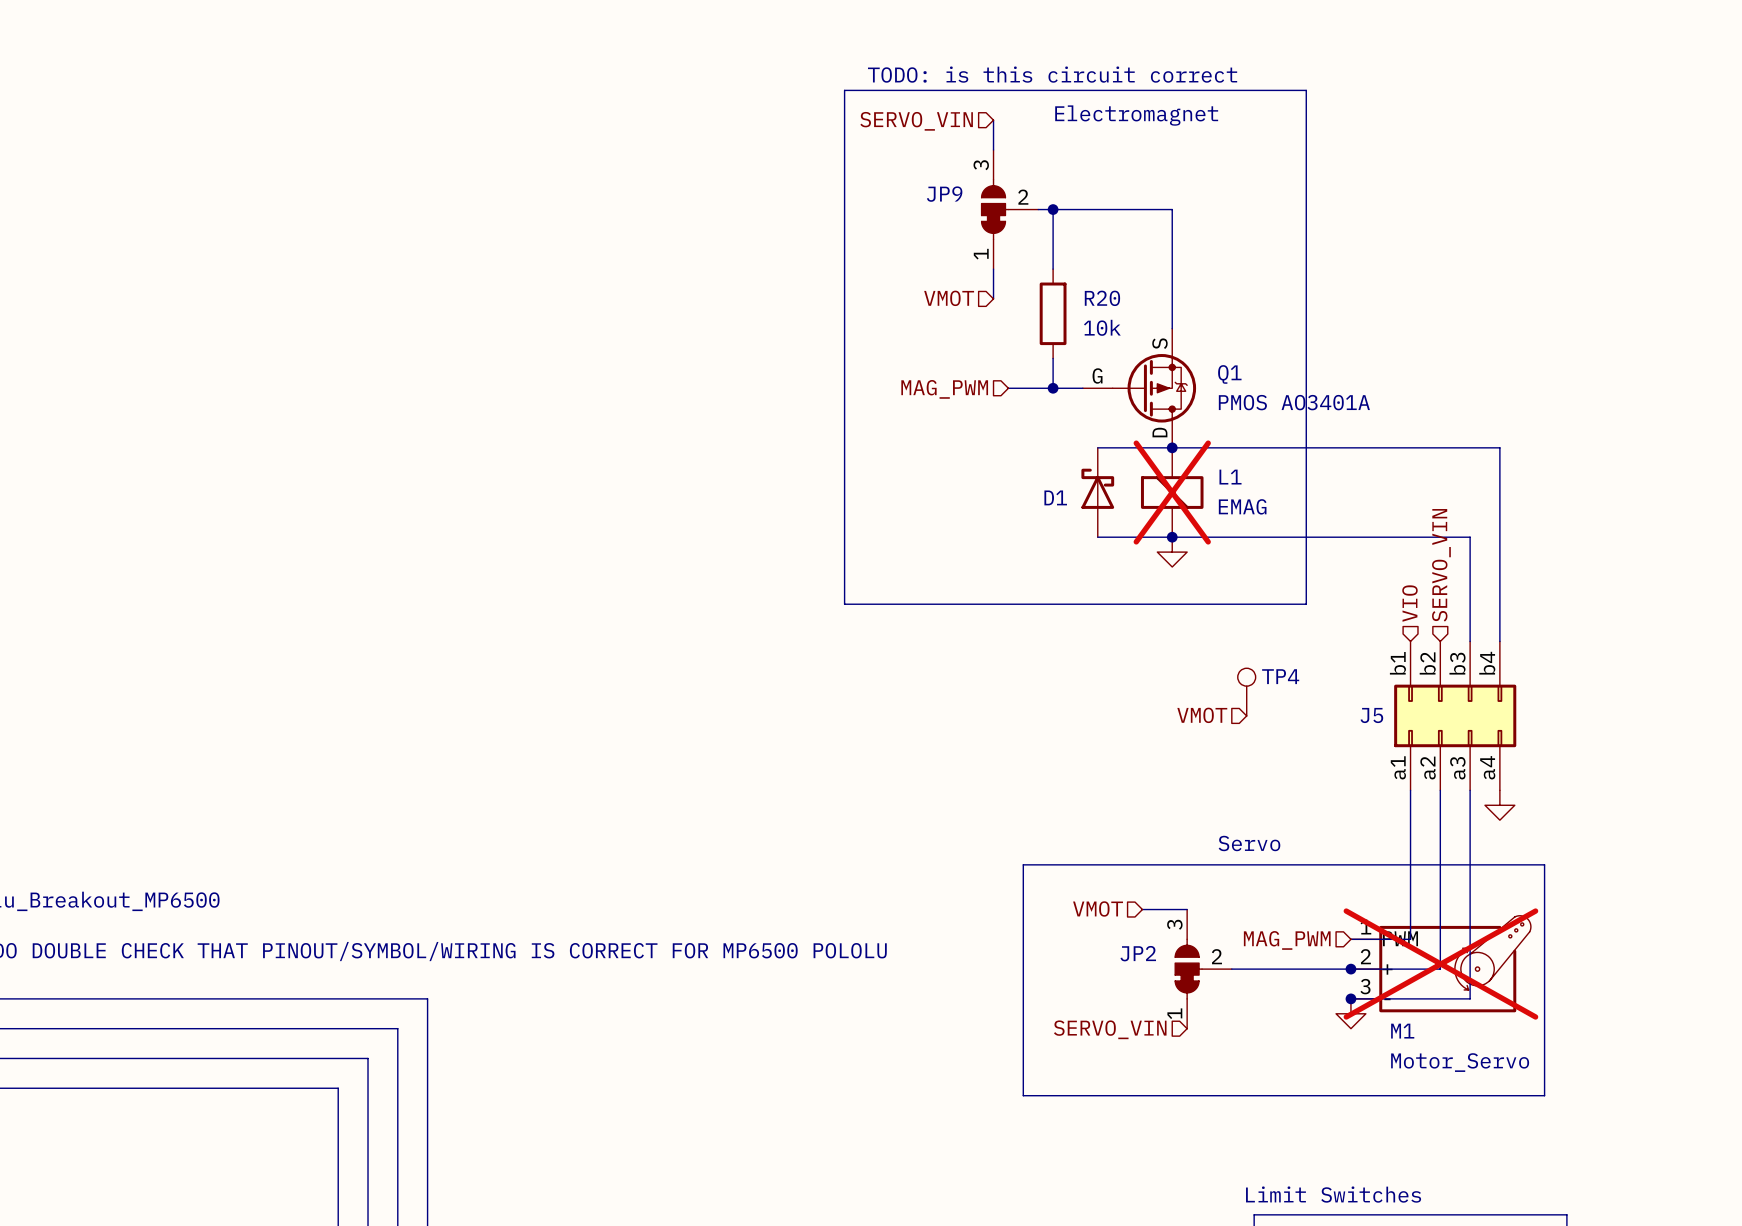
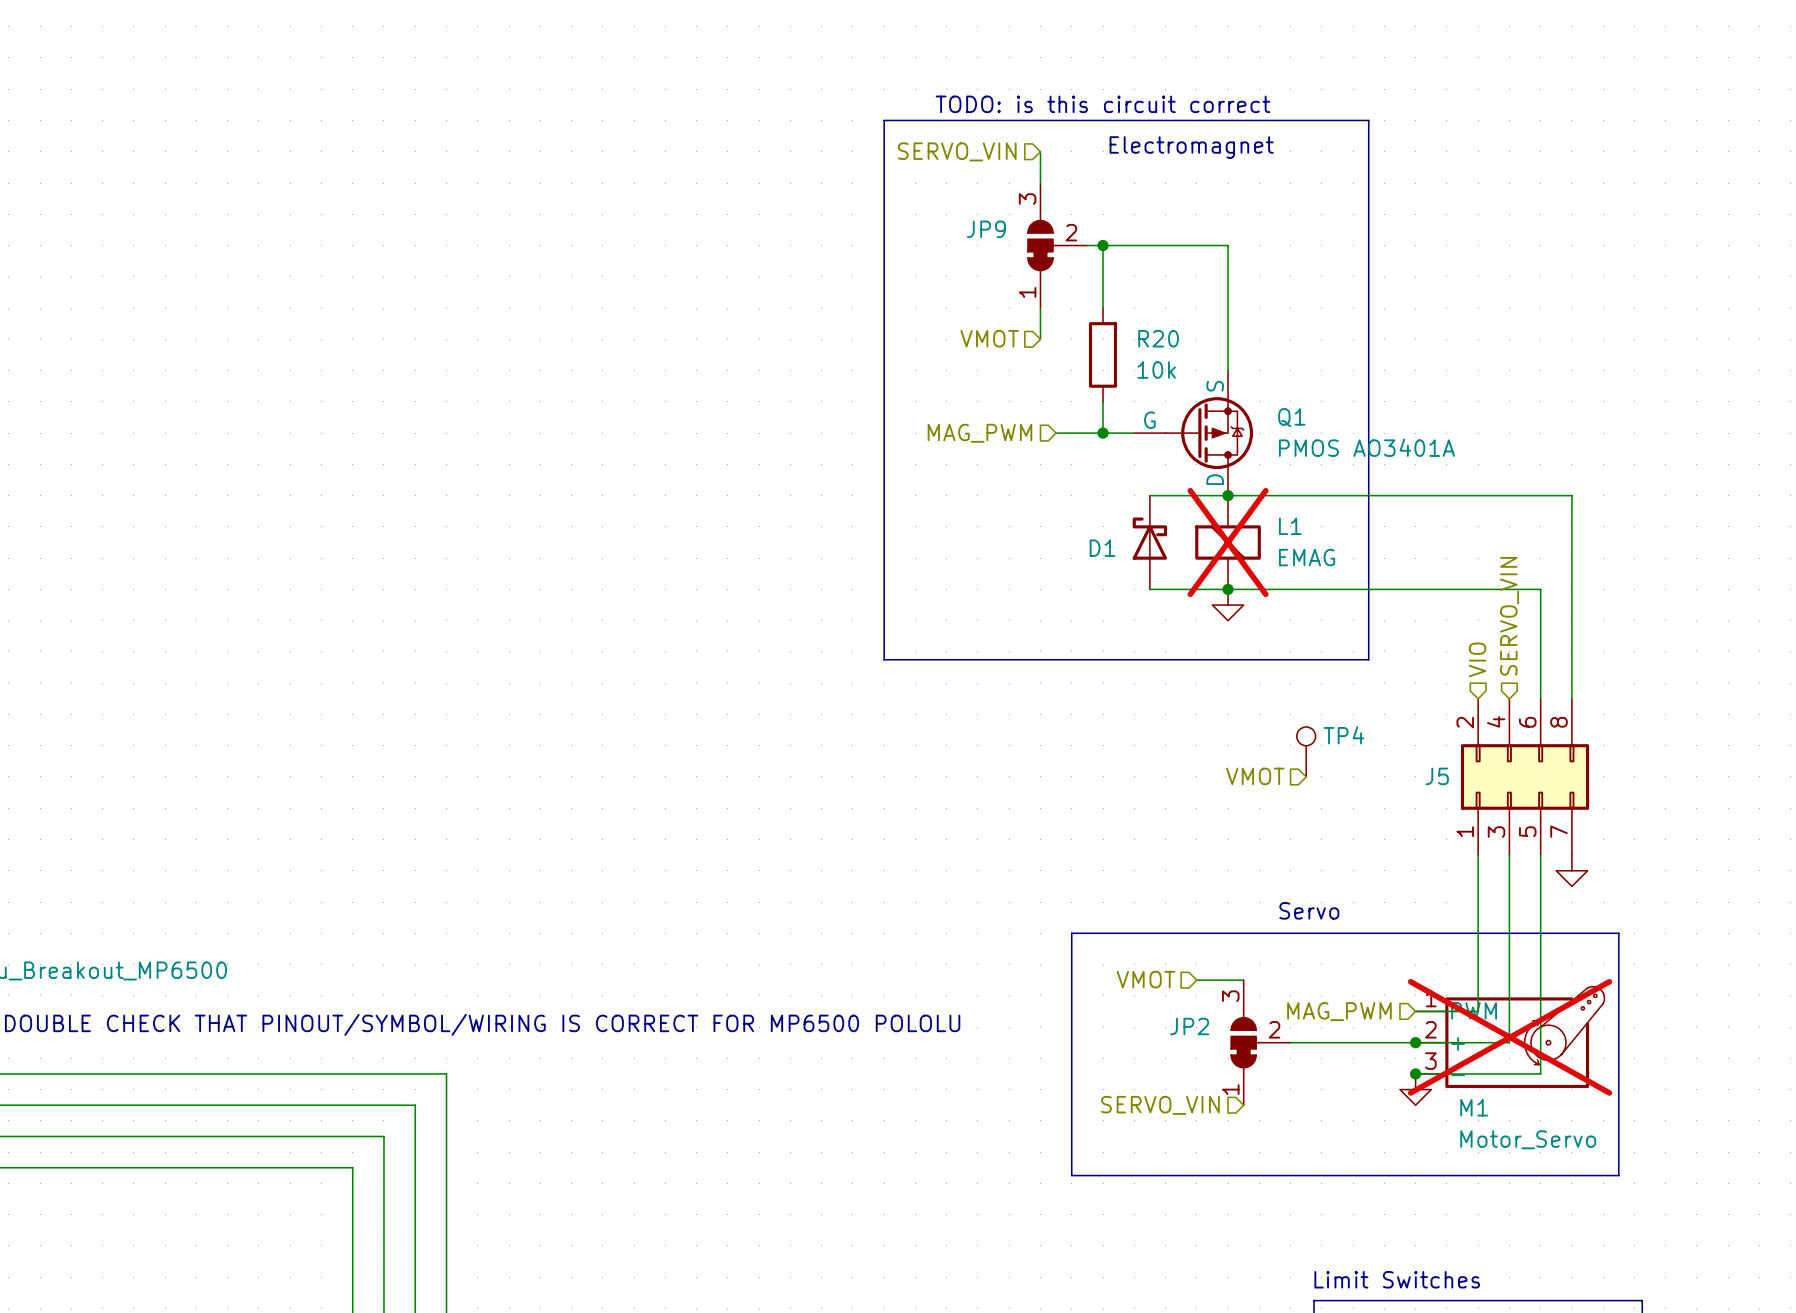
J5 pin number: b1 (1397, 663) -> 2 (1465, 722)
J5 pin number: b2 (1427, 663) -> 4 (1496, 721)
J5 pin number: b3 (1457, 663) -> 6 (1527, 722)
J5 pin number: b4 (1487, 663) -> 8 (1559, 722)
J5 pin number: a1 (1398, 767) -> 1 (1465, 831)
J5 pin number: a4 (1487, 767) -> 7 (1559, 831)
J5 pin number: a2 (1428, 768) -> 3 (1496, 832)
J5 pin number: a3 (1457, 768) -> 5 (1527, 831)

